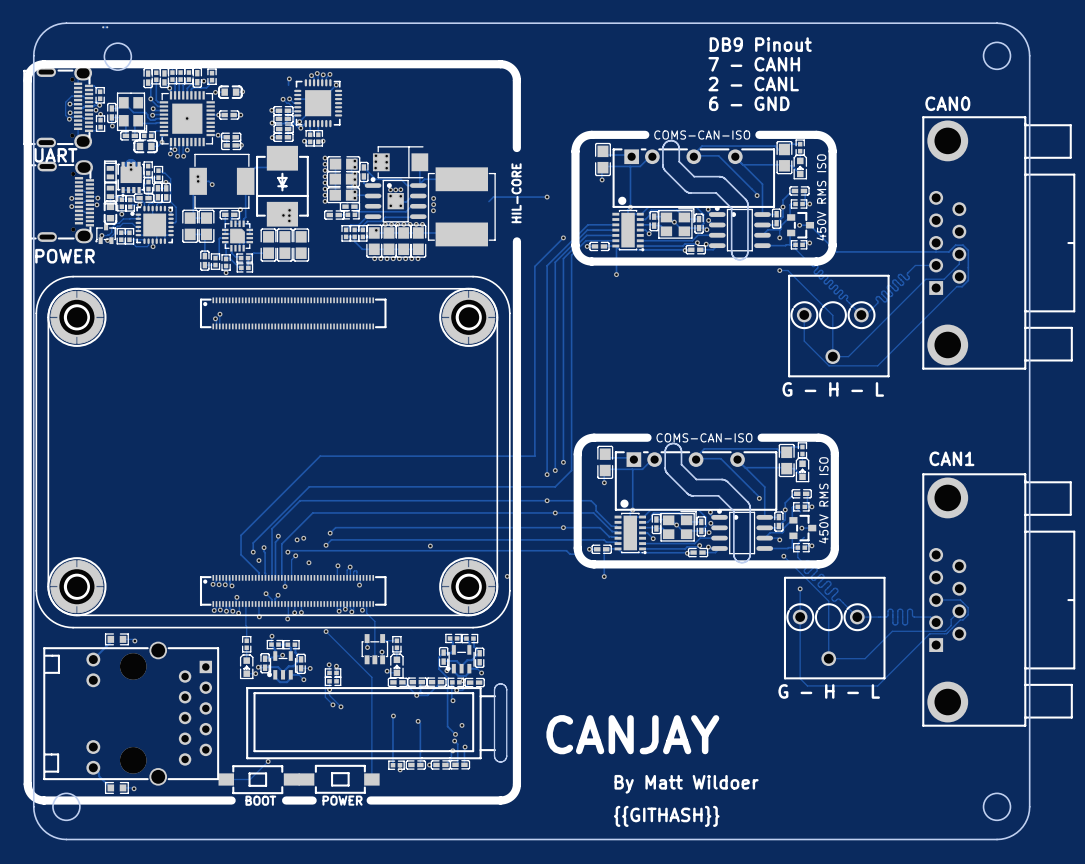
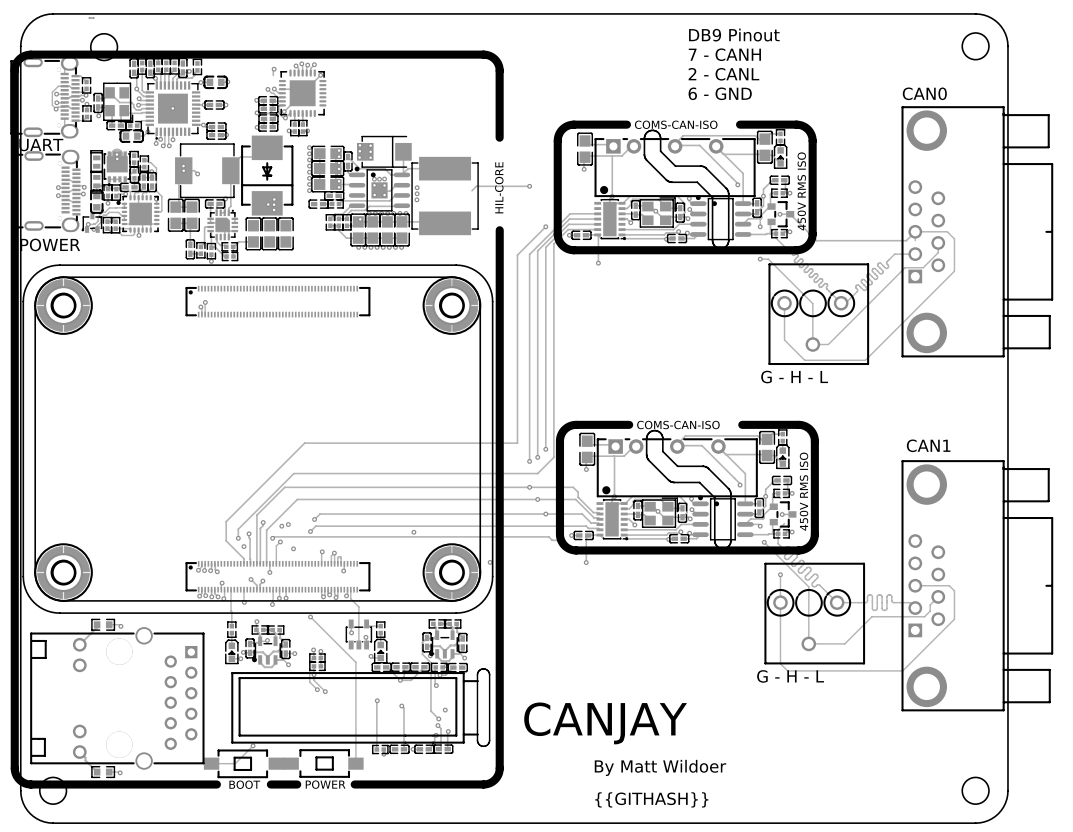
track: (927, 251) (948, 251) (955, 245) (963, 245) (968, 250) (968, 280) (962, 286) (957, 286) -> none
track: (959, 286) (956, 286) (877, 365) (829, 365) (804, 341) -> (906, 240) (915, 231) (947, 231) (954, 238) (954, 271) (865, 360) (804, 360) (784, 340) (784, 329)
track: (960, 599) (968, 607) (968, 614) (946, 633) (929, 633) (877, 685) -> (939, 585) (949, 585) (954, 590) (954, 619) (902, 670) (857, 670)

